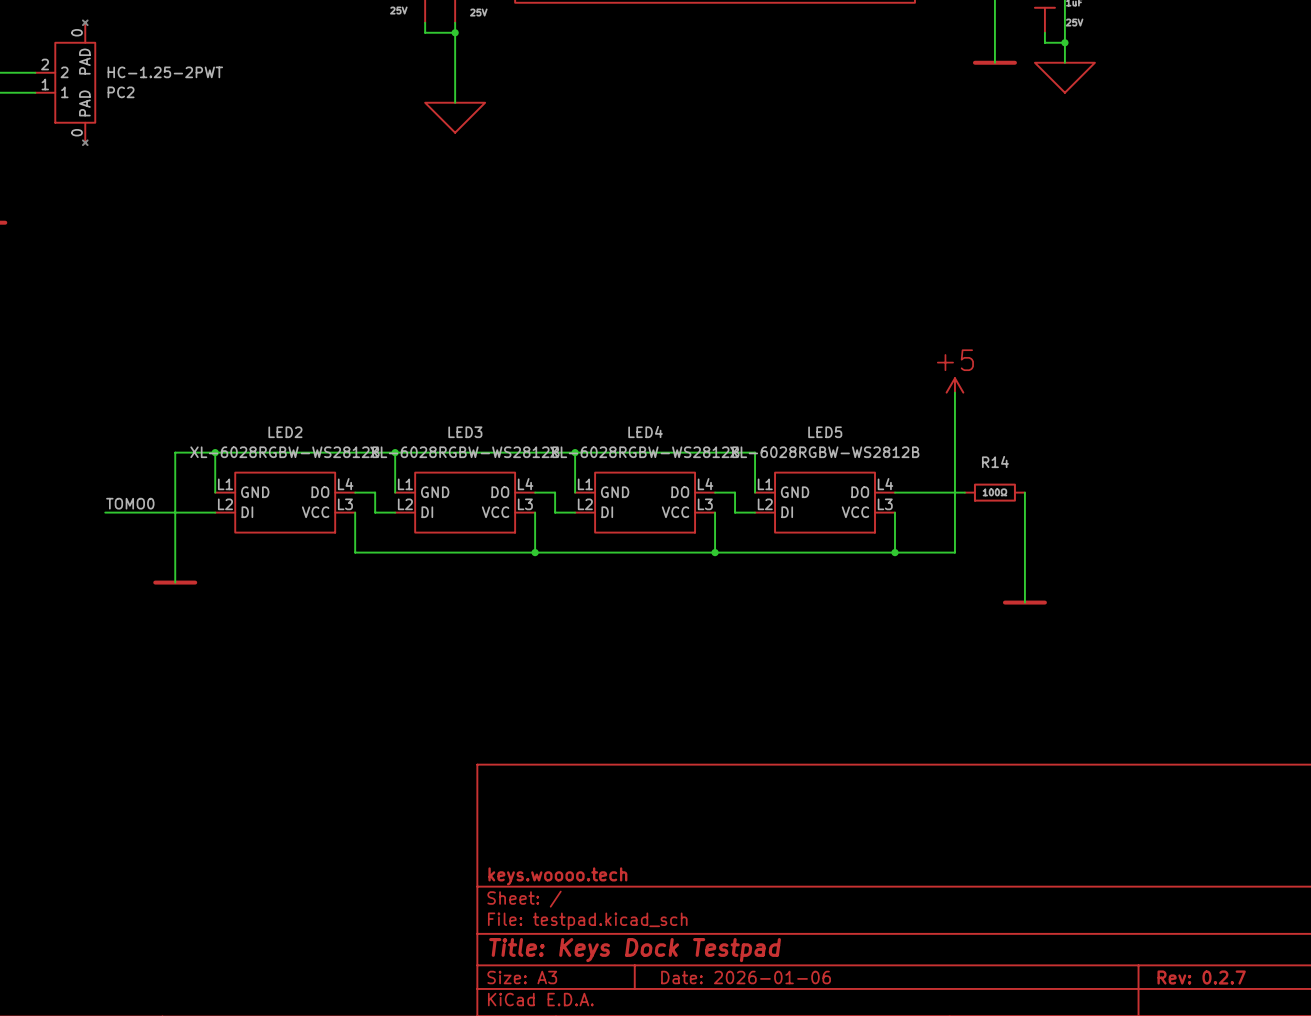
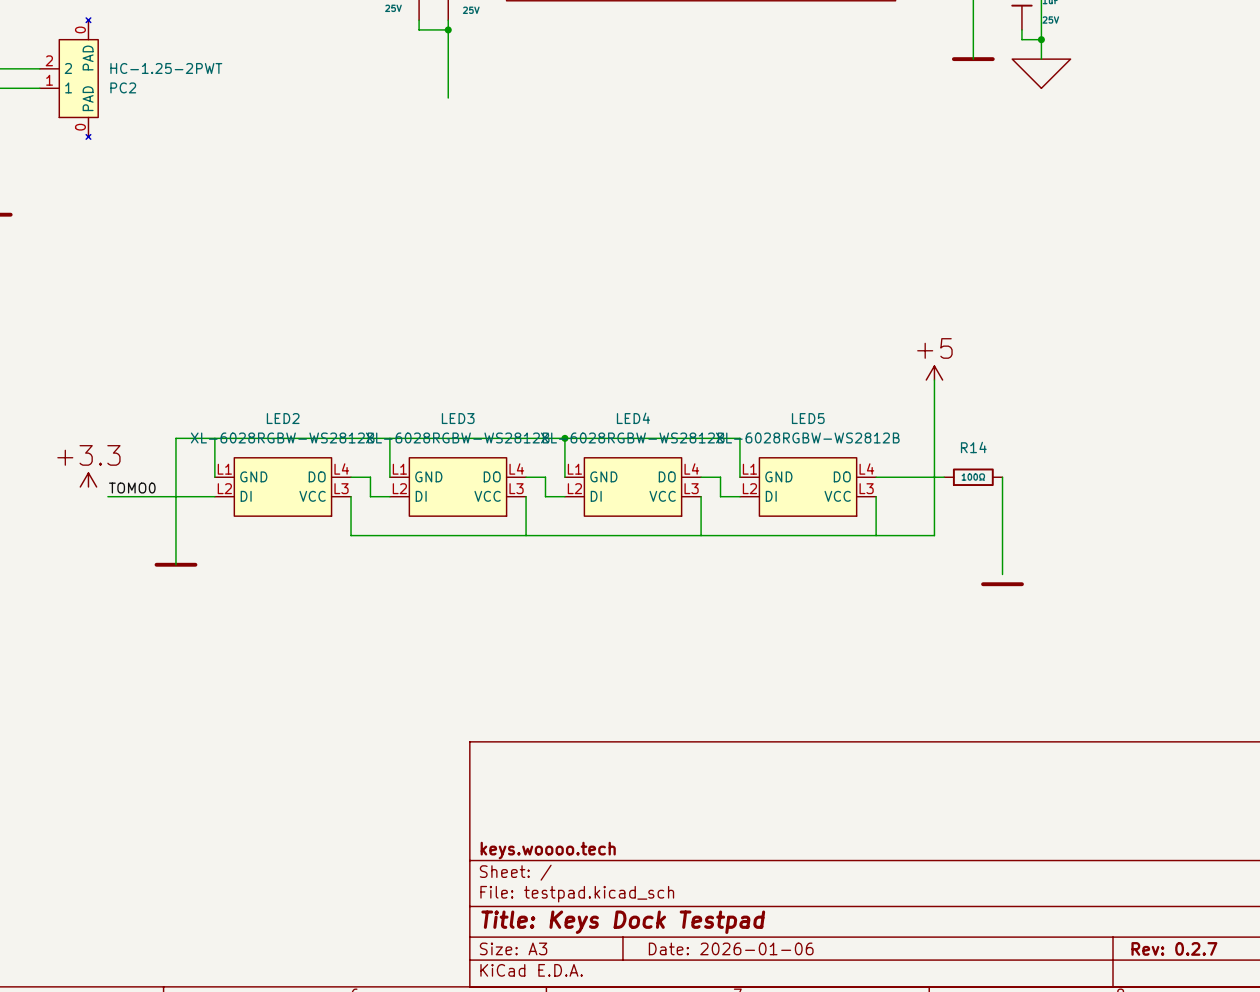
power symbol: (455, 117) -> none
junction: (215, 452) -> none
junction: (395, 452) -> none
power symbol: none -> (88, 479)
junction: (535, 552) -> none
junction: (715, 552) -> none
junction: (894, 552) -> none
wire: (1024, 592) (1024, 602) -> none

